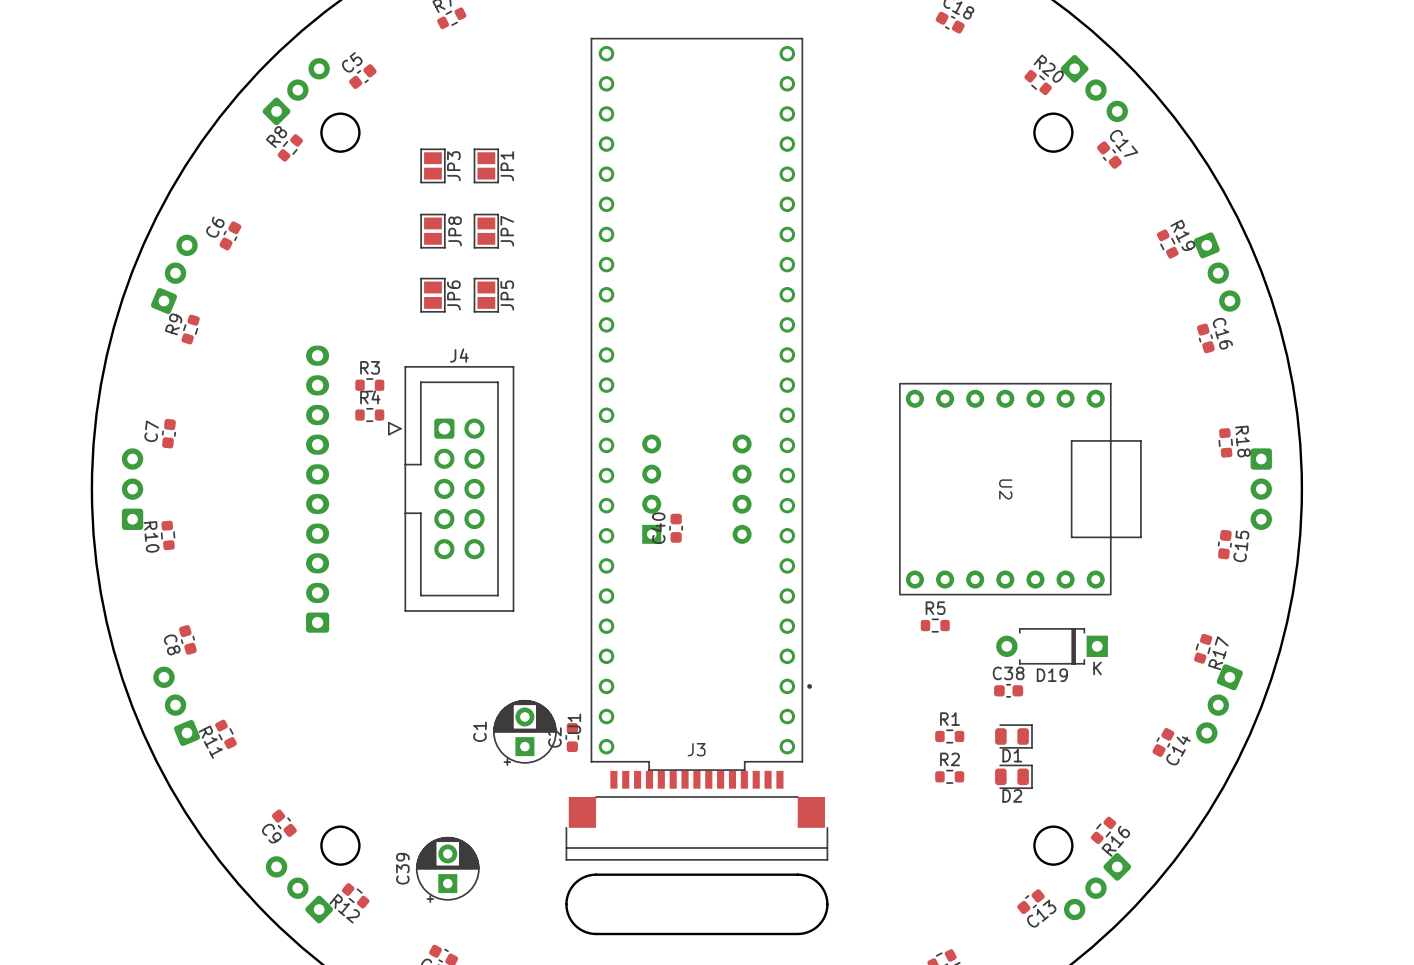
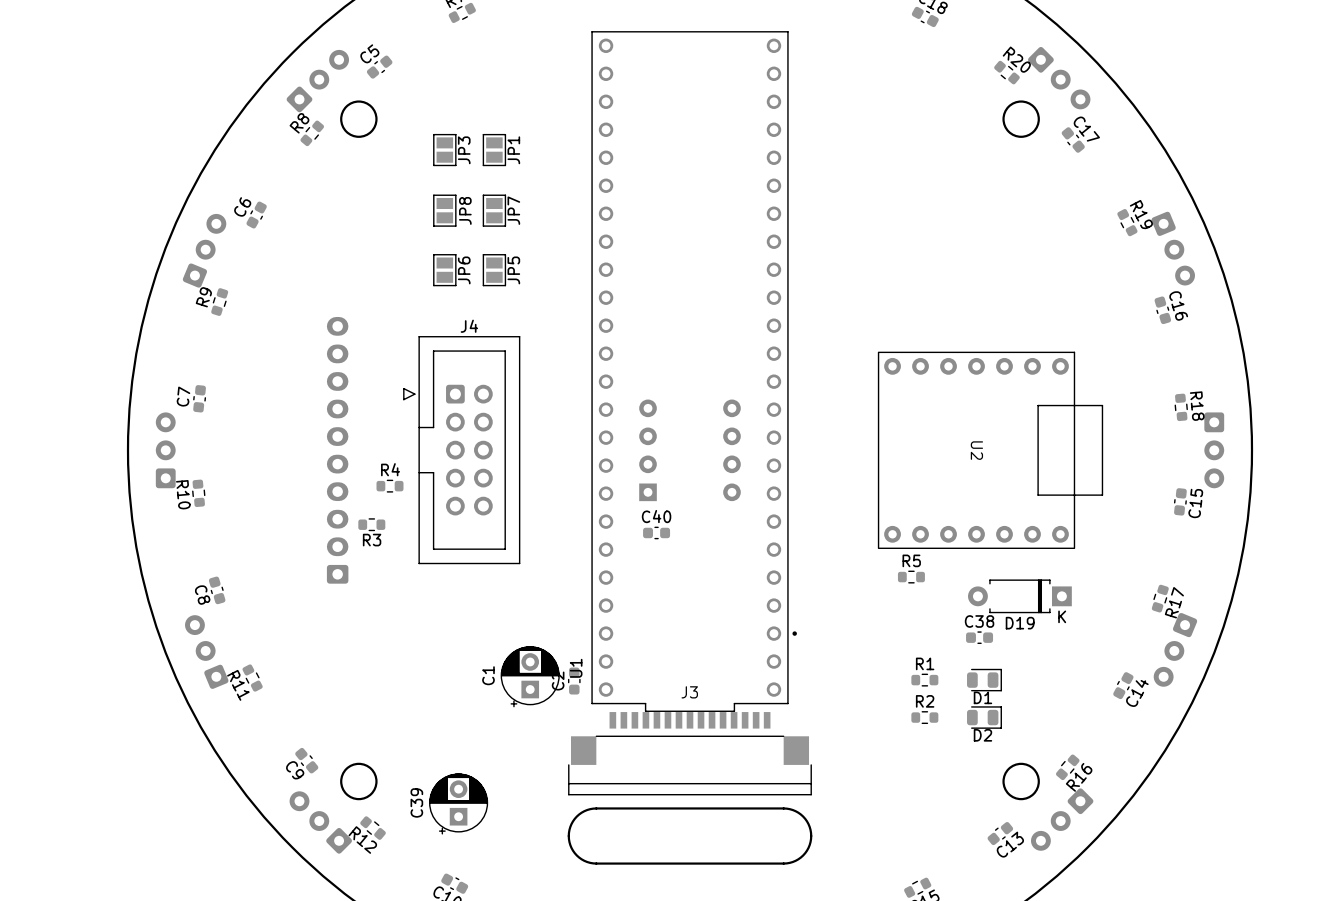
R3 name position: R3 (370, 367) -> R3 (372, 540)
R3 position: (369, 385) -> (371, 524)
R4 position: (369, 415) -> (389, 486)
C40 rotation: 0° (676, 528) -> 90° clockwise (656, 532)
C40 position: (676, 528) -> (656, 532)

